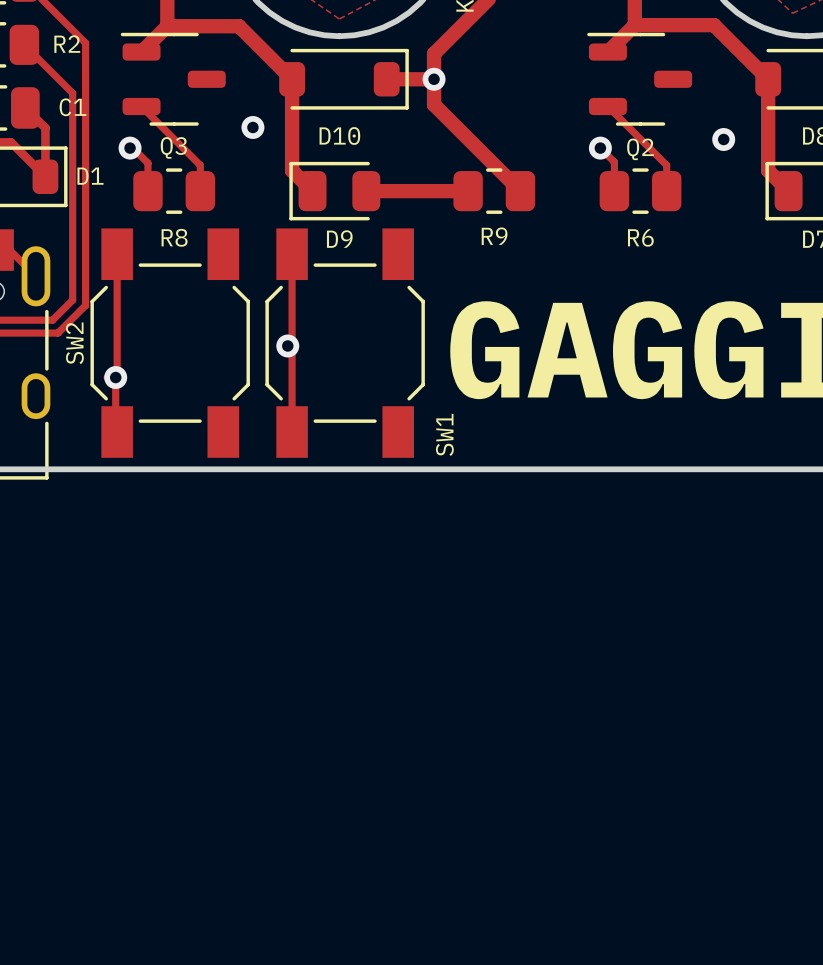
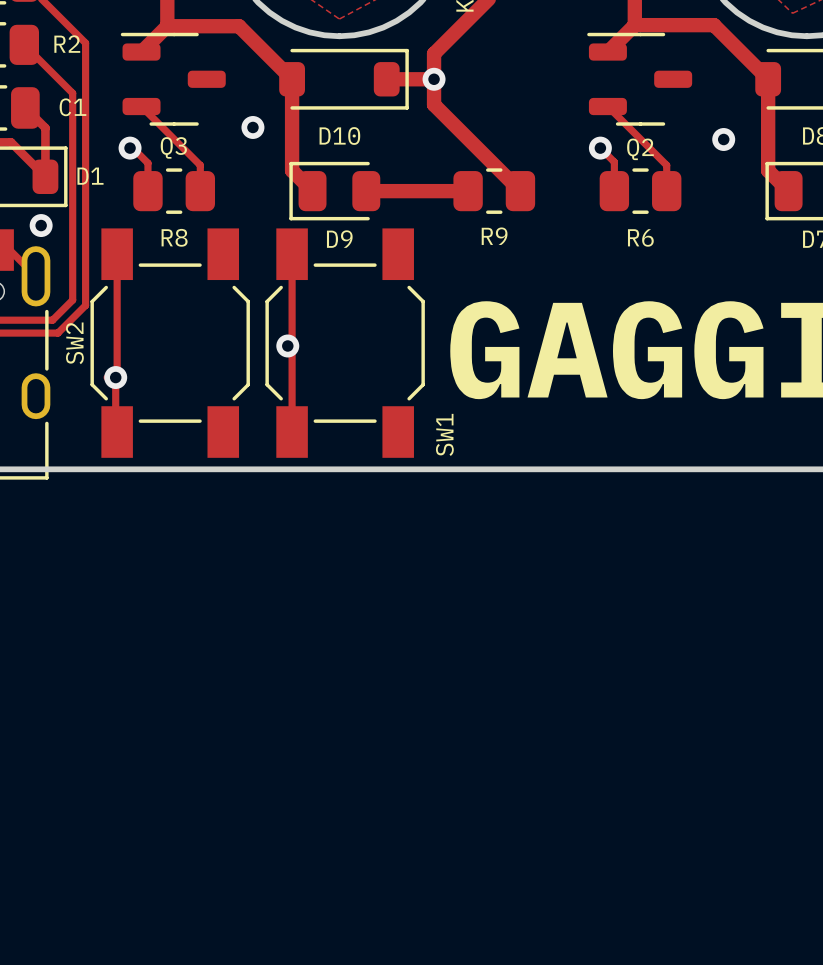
via: none -> (41, 225)

